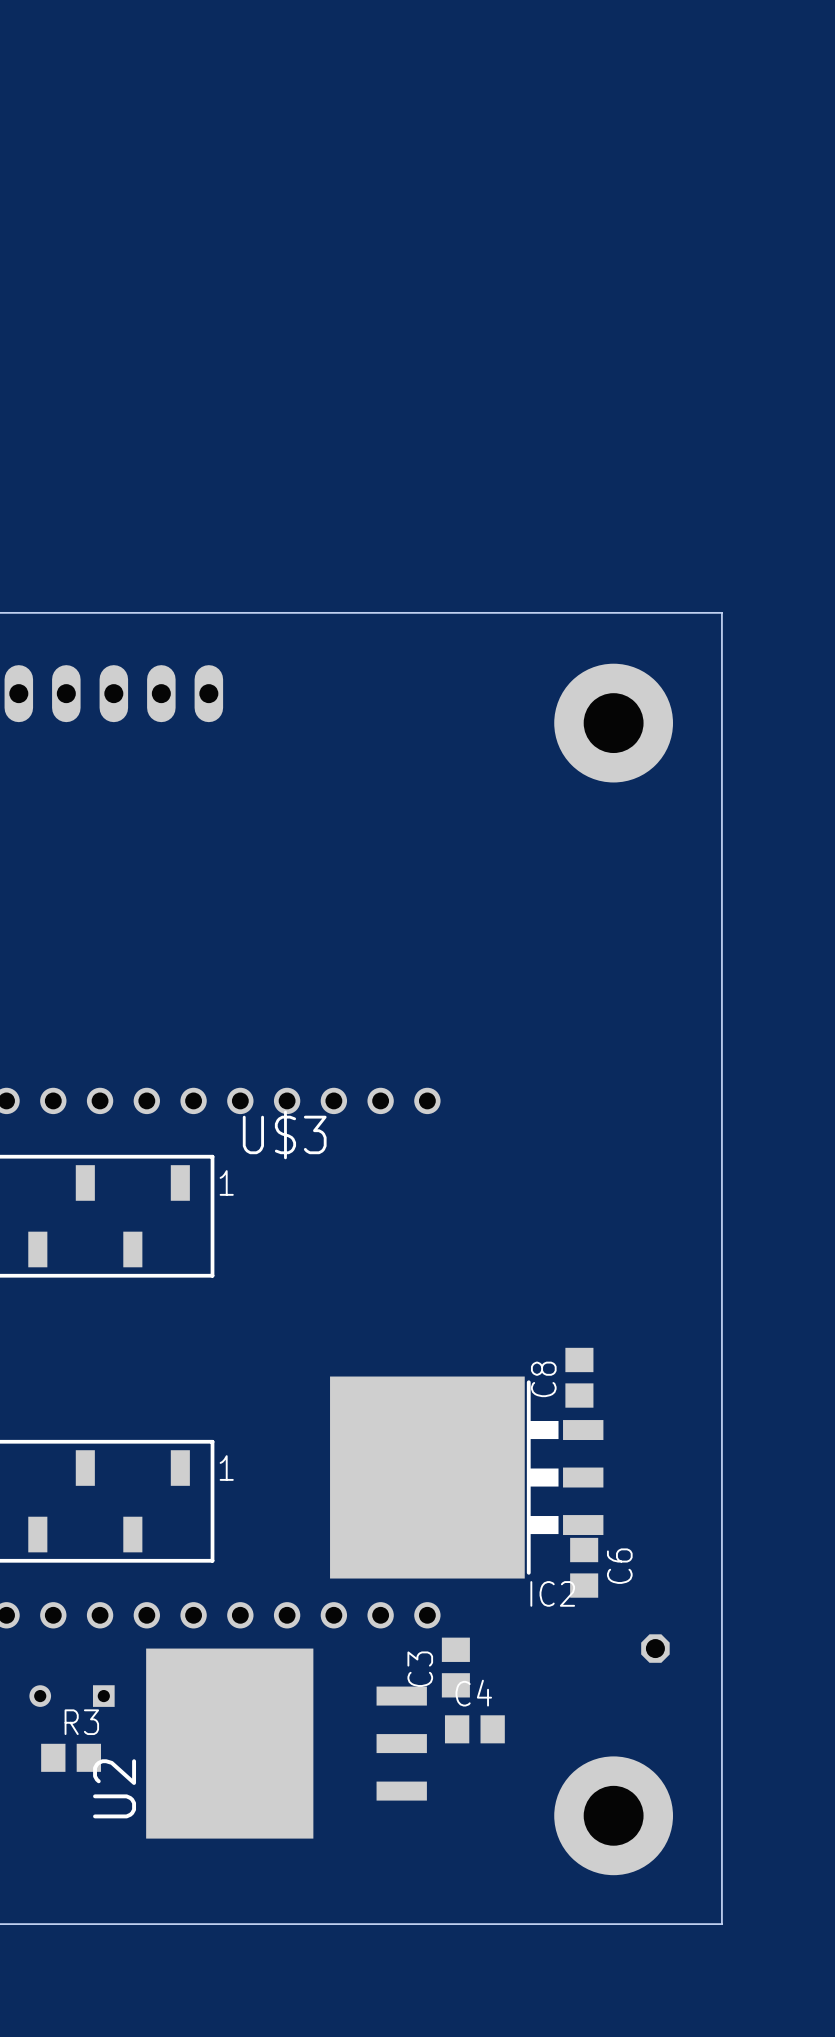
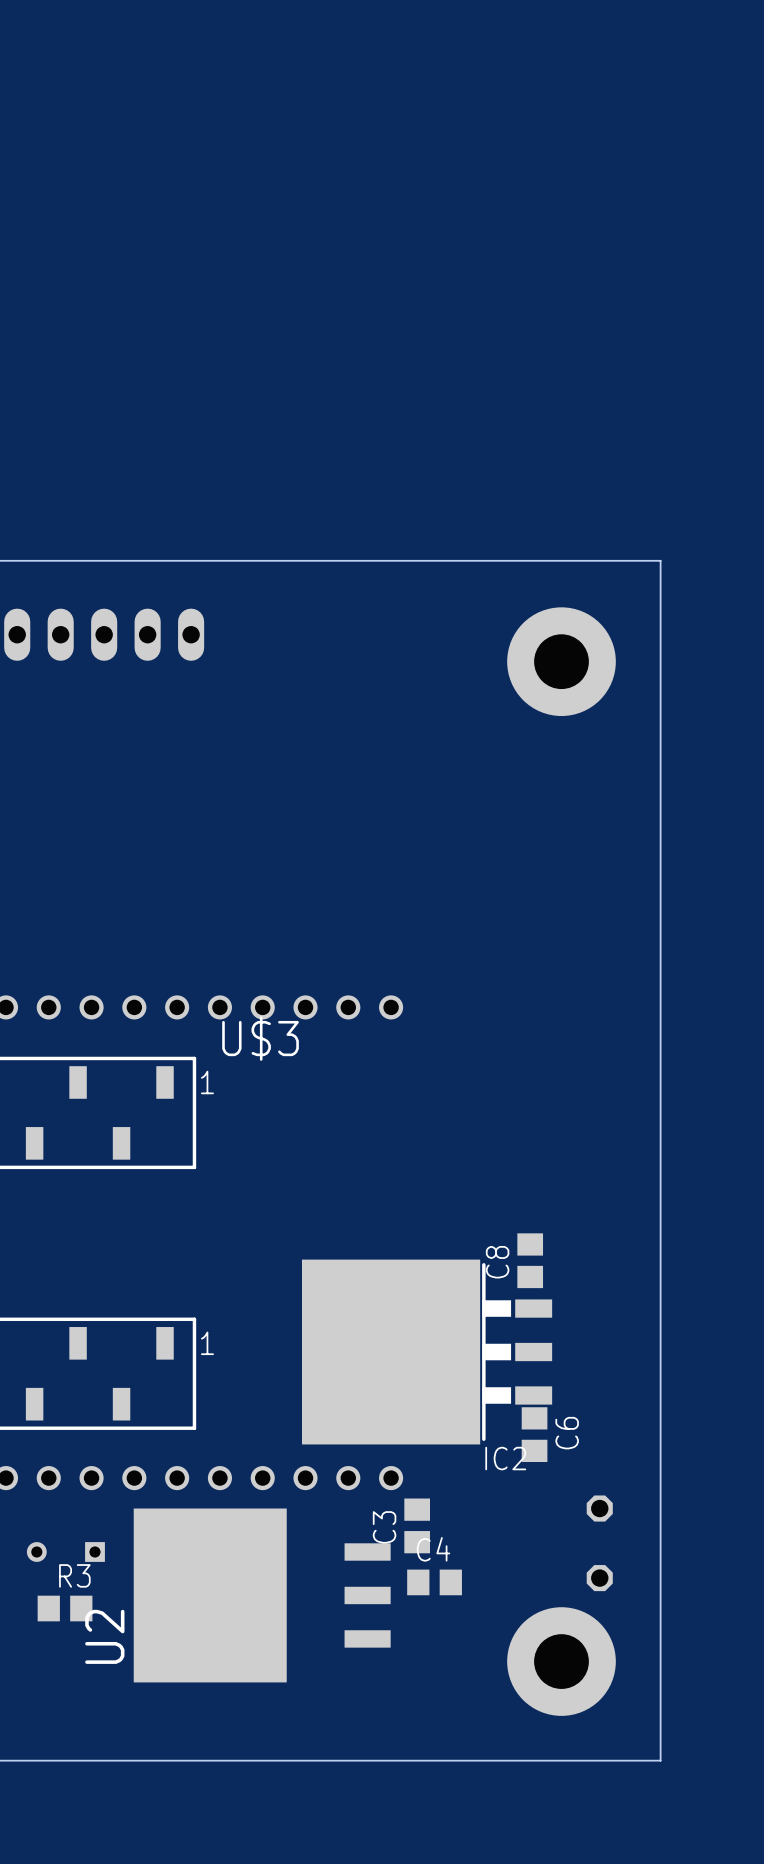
part: none -> (599, 1578)

